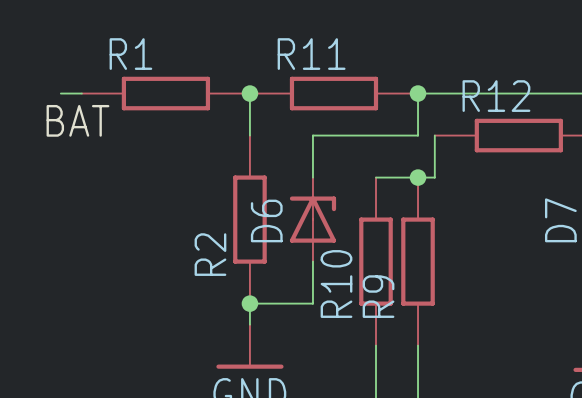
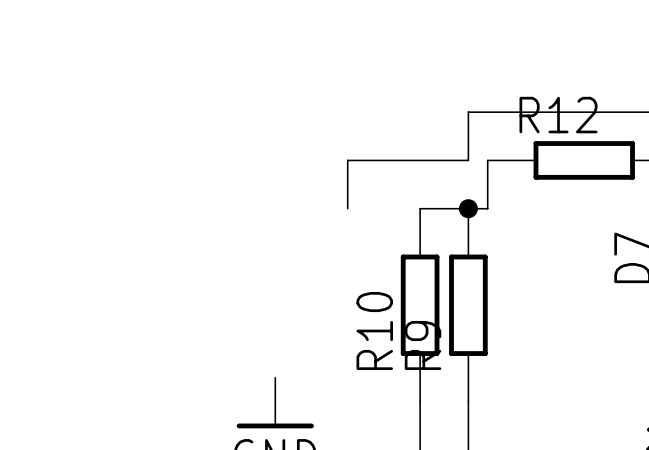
wire: (60, 93) (81, 93) -> none
R1: (165, 93) -> none
wire: (249, 93) (249, 135) -> none
junction: (249, 93) -> none
R11: (333, 93) -> none
junction: (418, 93) -> none
label: BAT (77, 120) -> none
R2: (249, 219) -> none
D6: (312, 219) -> none
wire: (312, 261) (312, 303) (249, 303) (249, 324) -> none
junction: (249, 303) -> none

